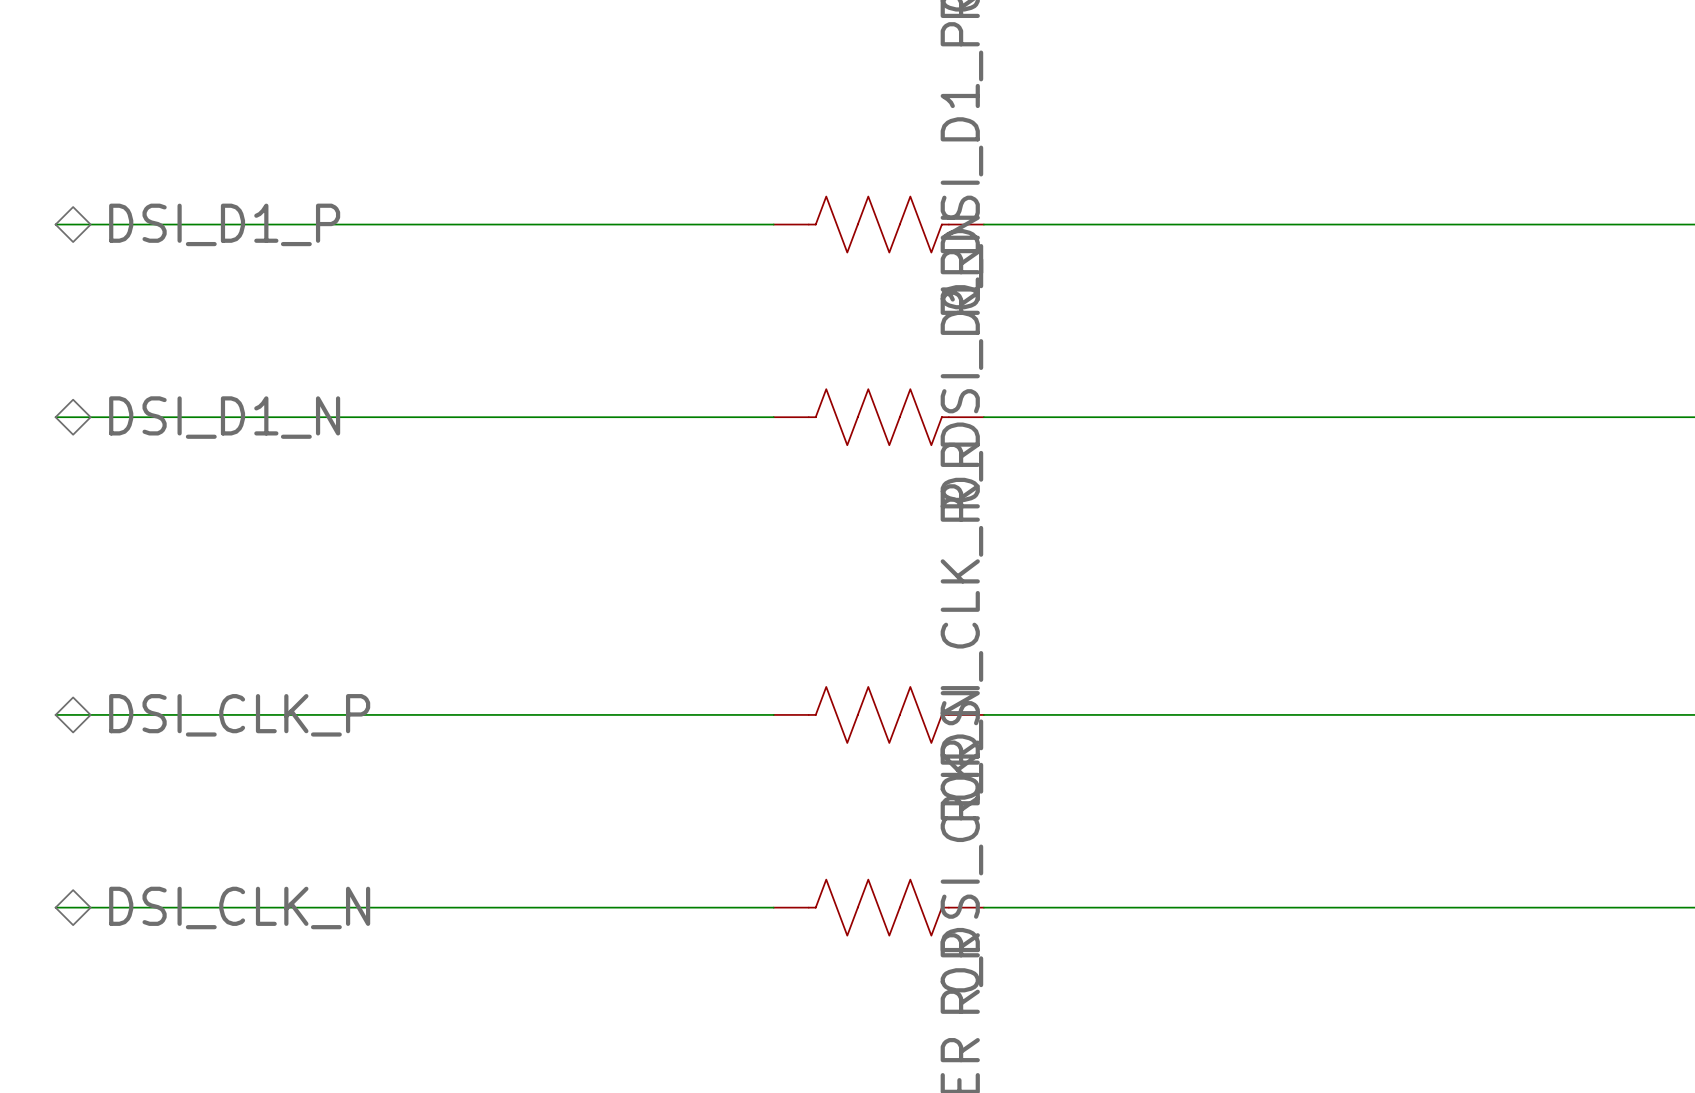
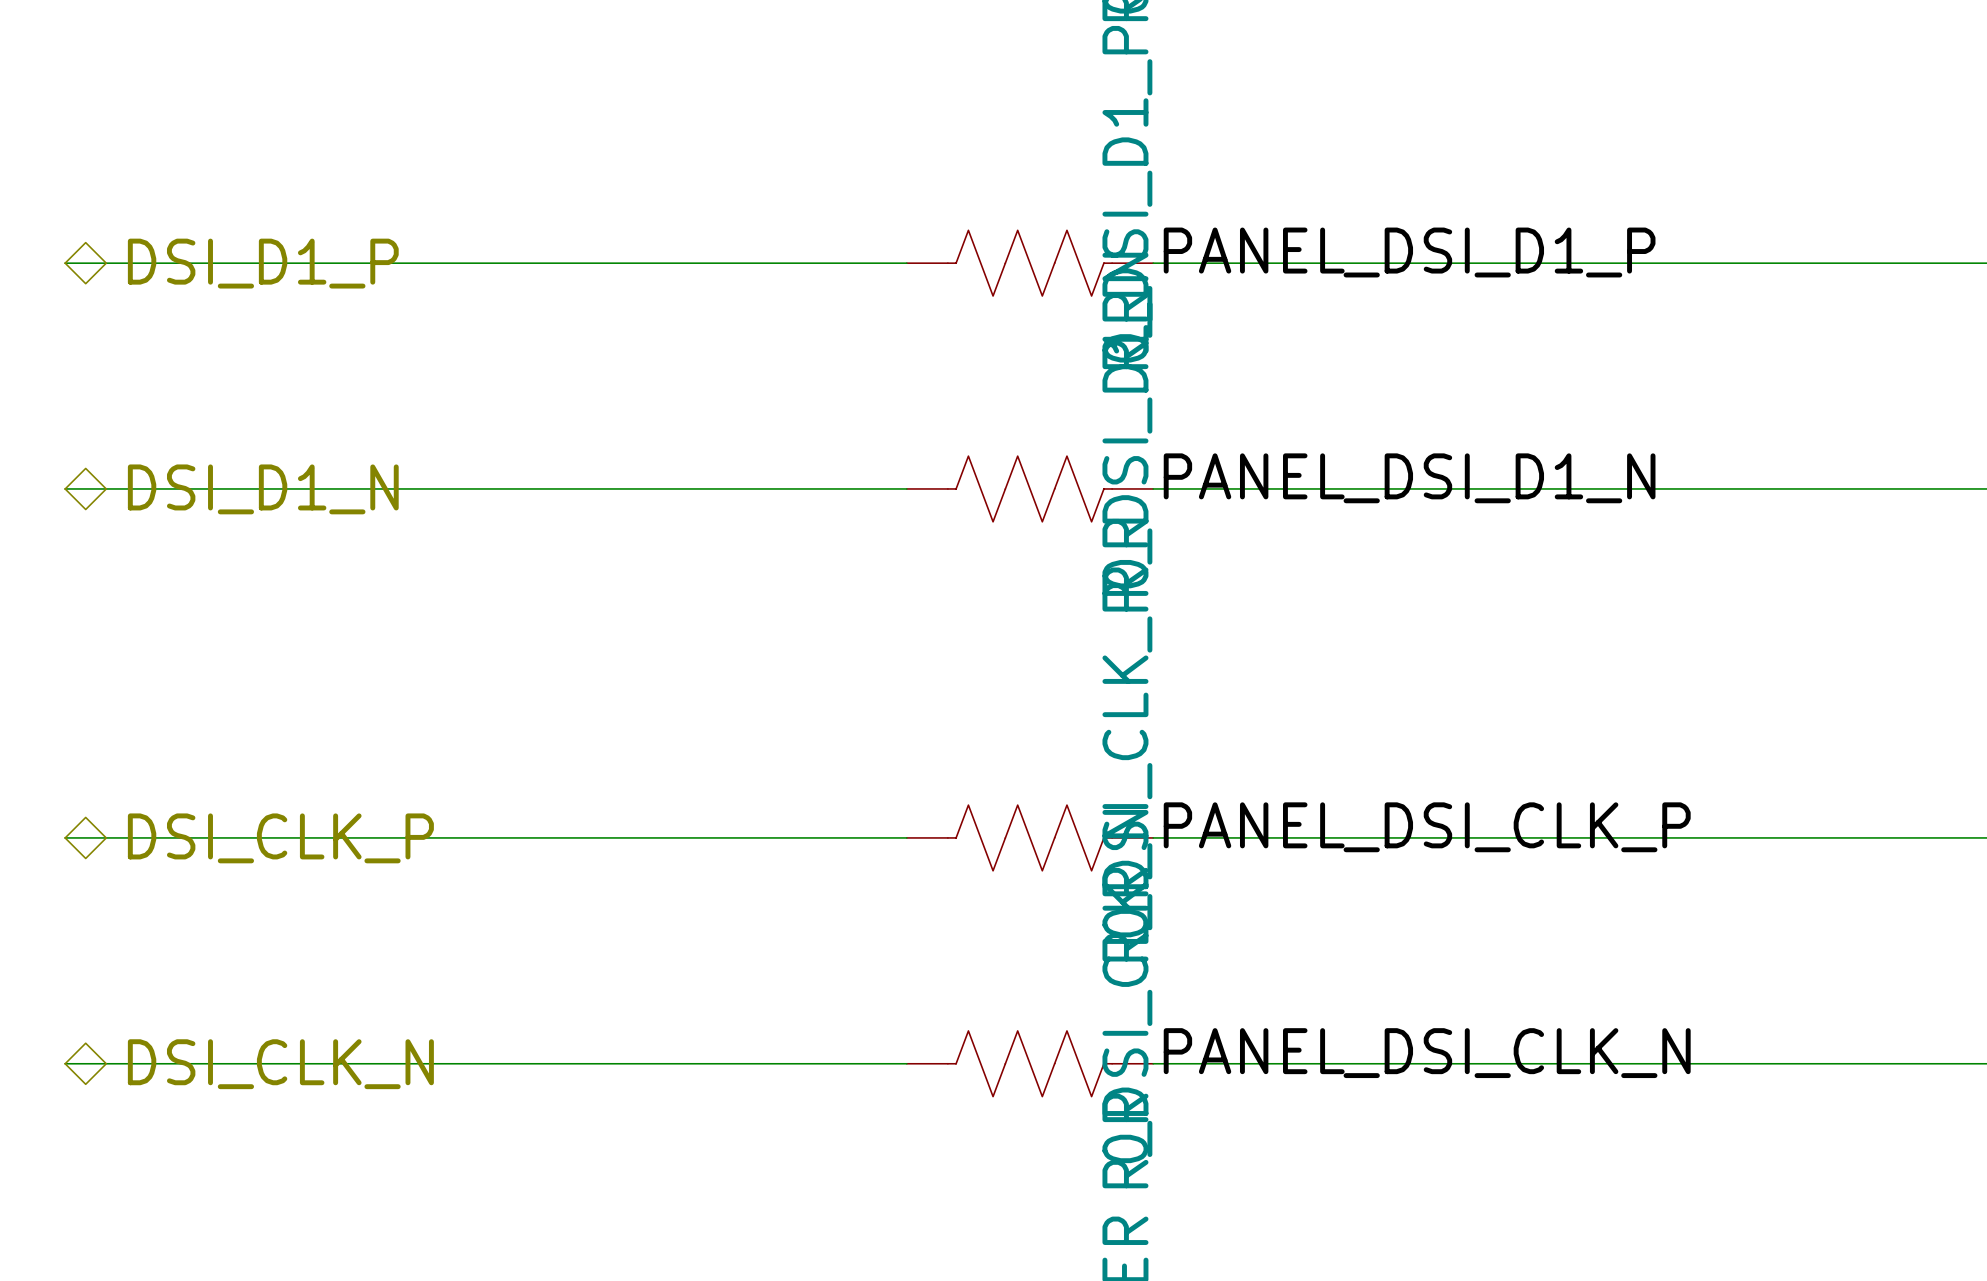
label: none -> PANEL_DSI_D1_P (1409, 252)
label: none -> PANEL_DSI_D1_N (1409, 478)
label: none -> PANEL_DSI_CLK_P (1427, 827)
label: none -> PANEL_DSI_CLK_N (1427, 1053)

